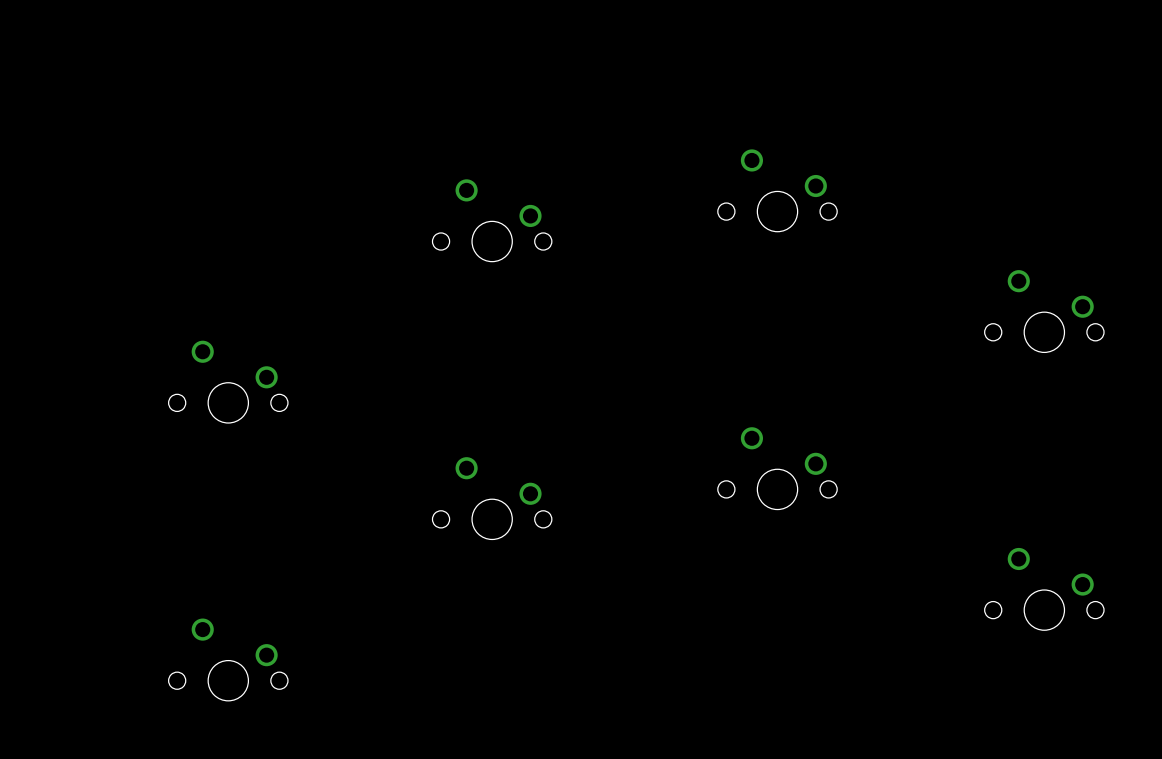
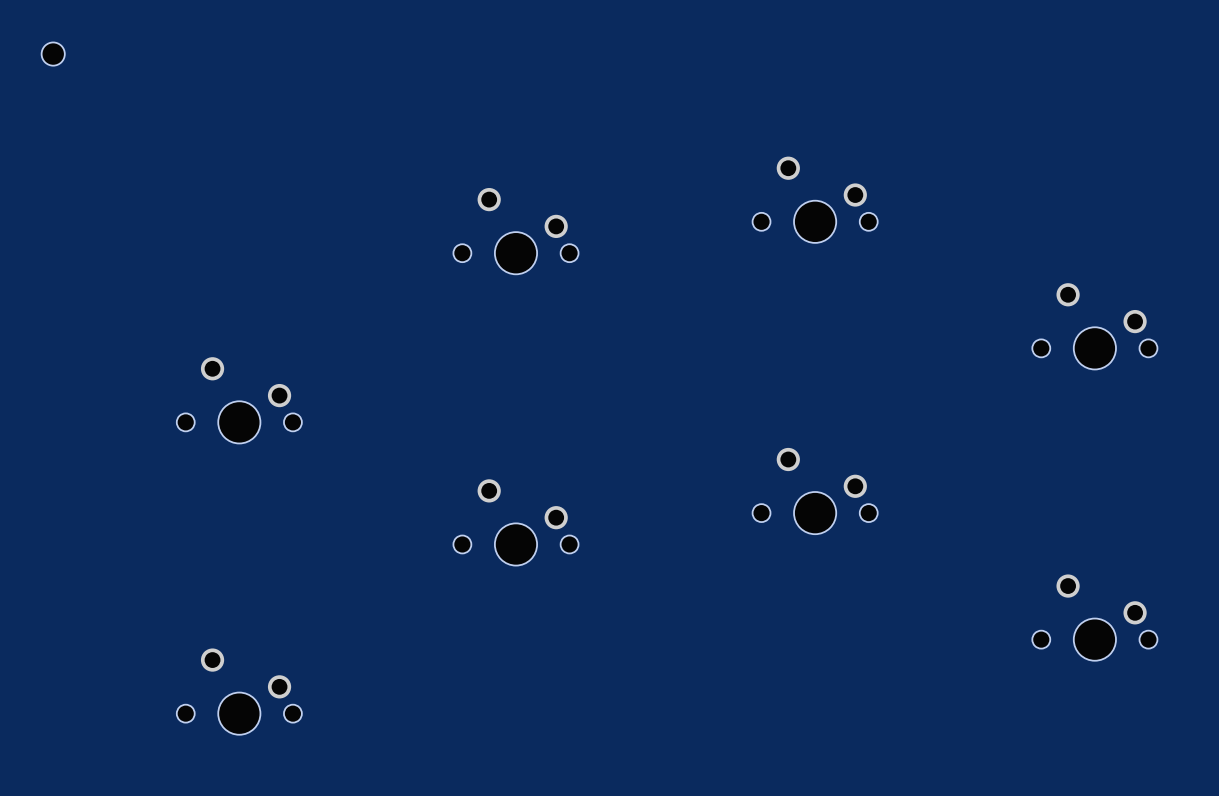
part: none -> (53, 54)

